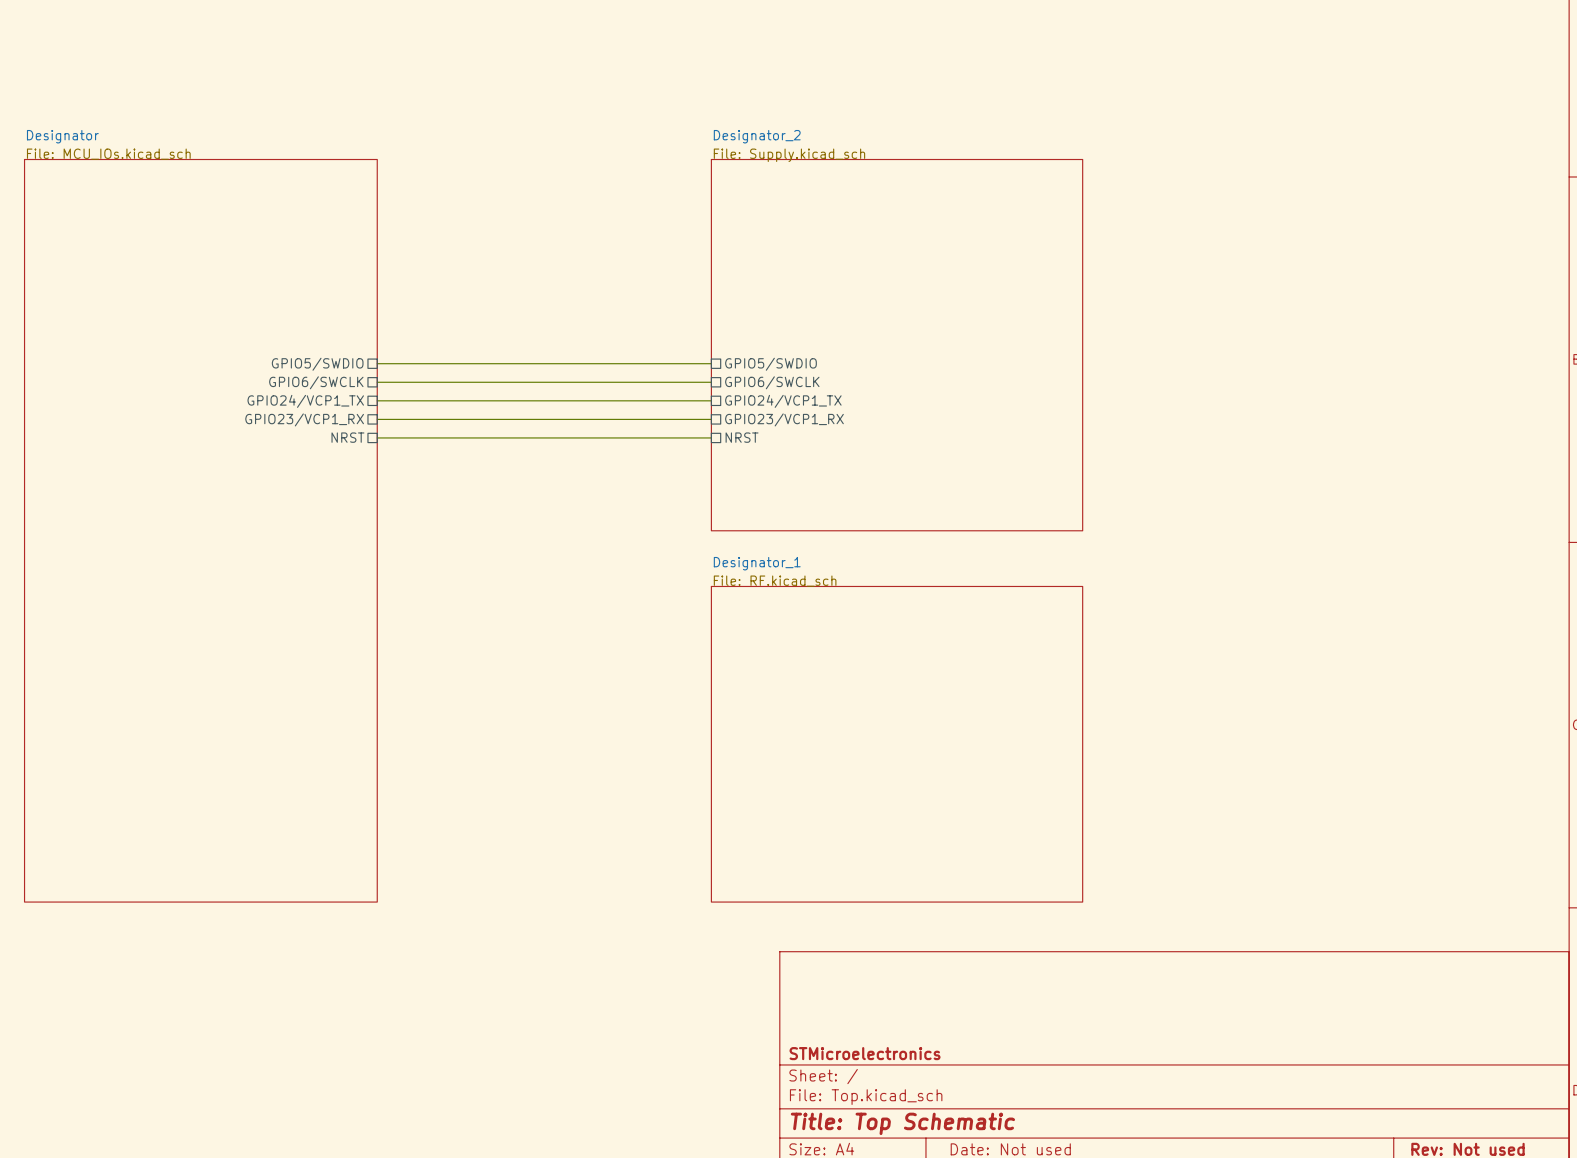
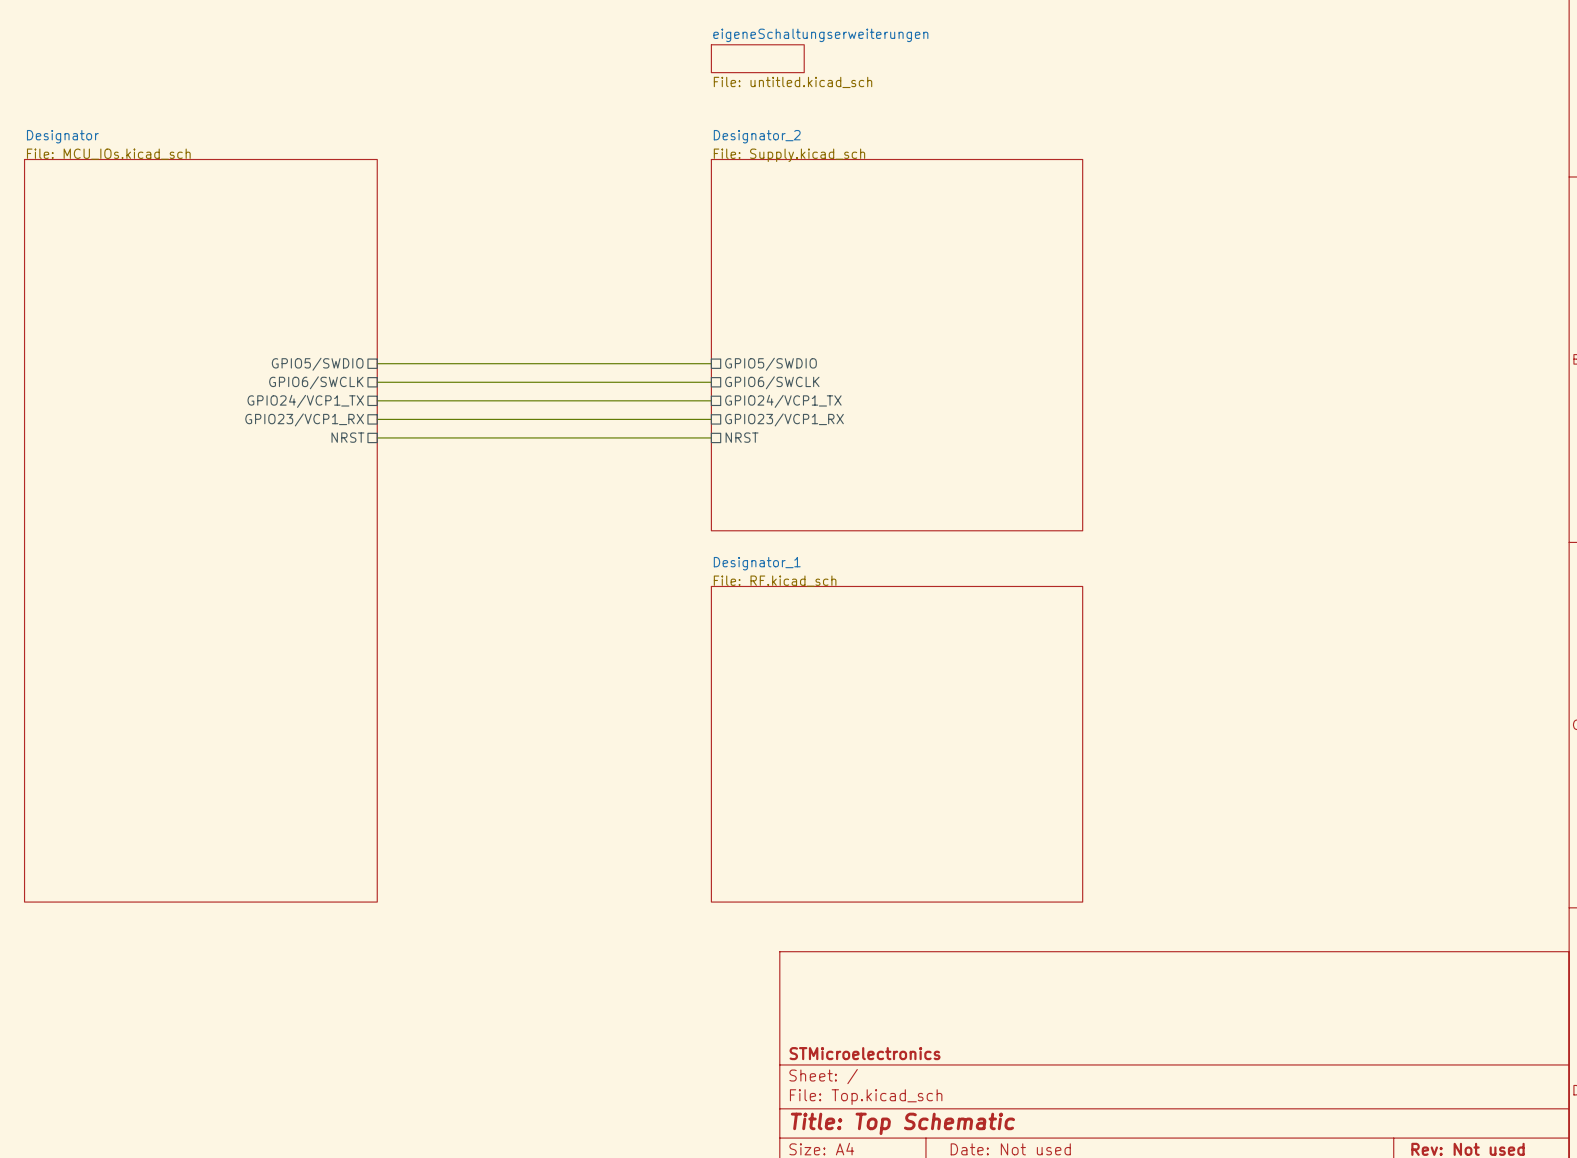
sheet eigeneSchaltungserweiterungen: none -> File: untitled.kicad_sch (757, 58)

